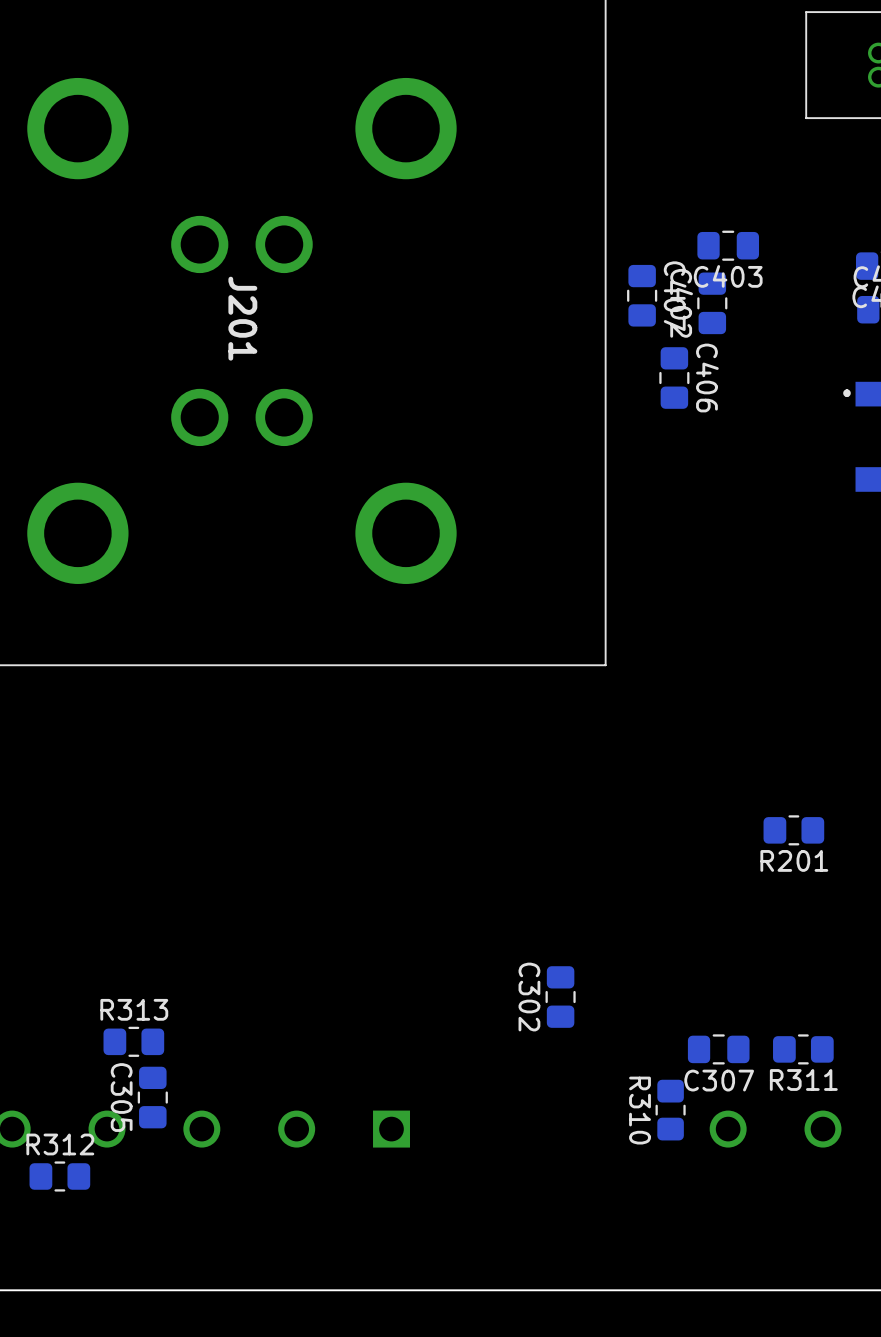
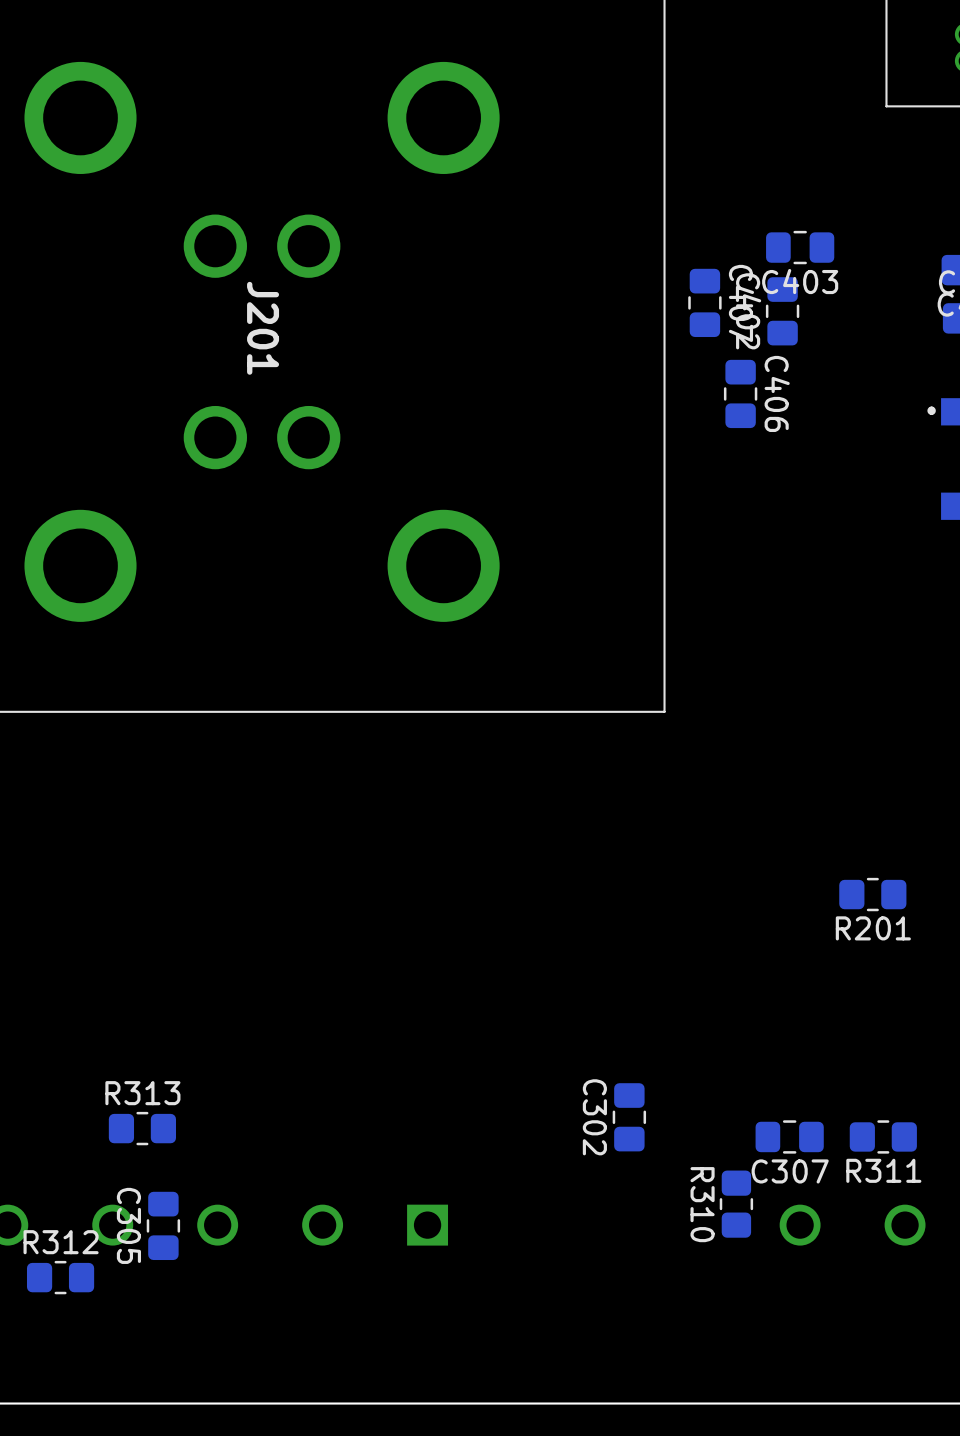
C302 position: (560, 997) -> (629, 1117)
C305 position: (152, 1097) -> (163, 1225)

